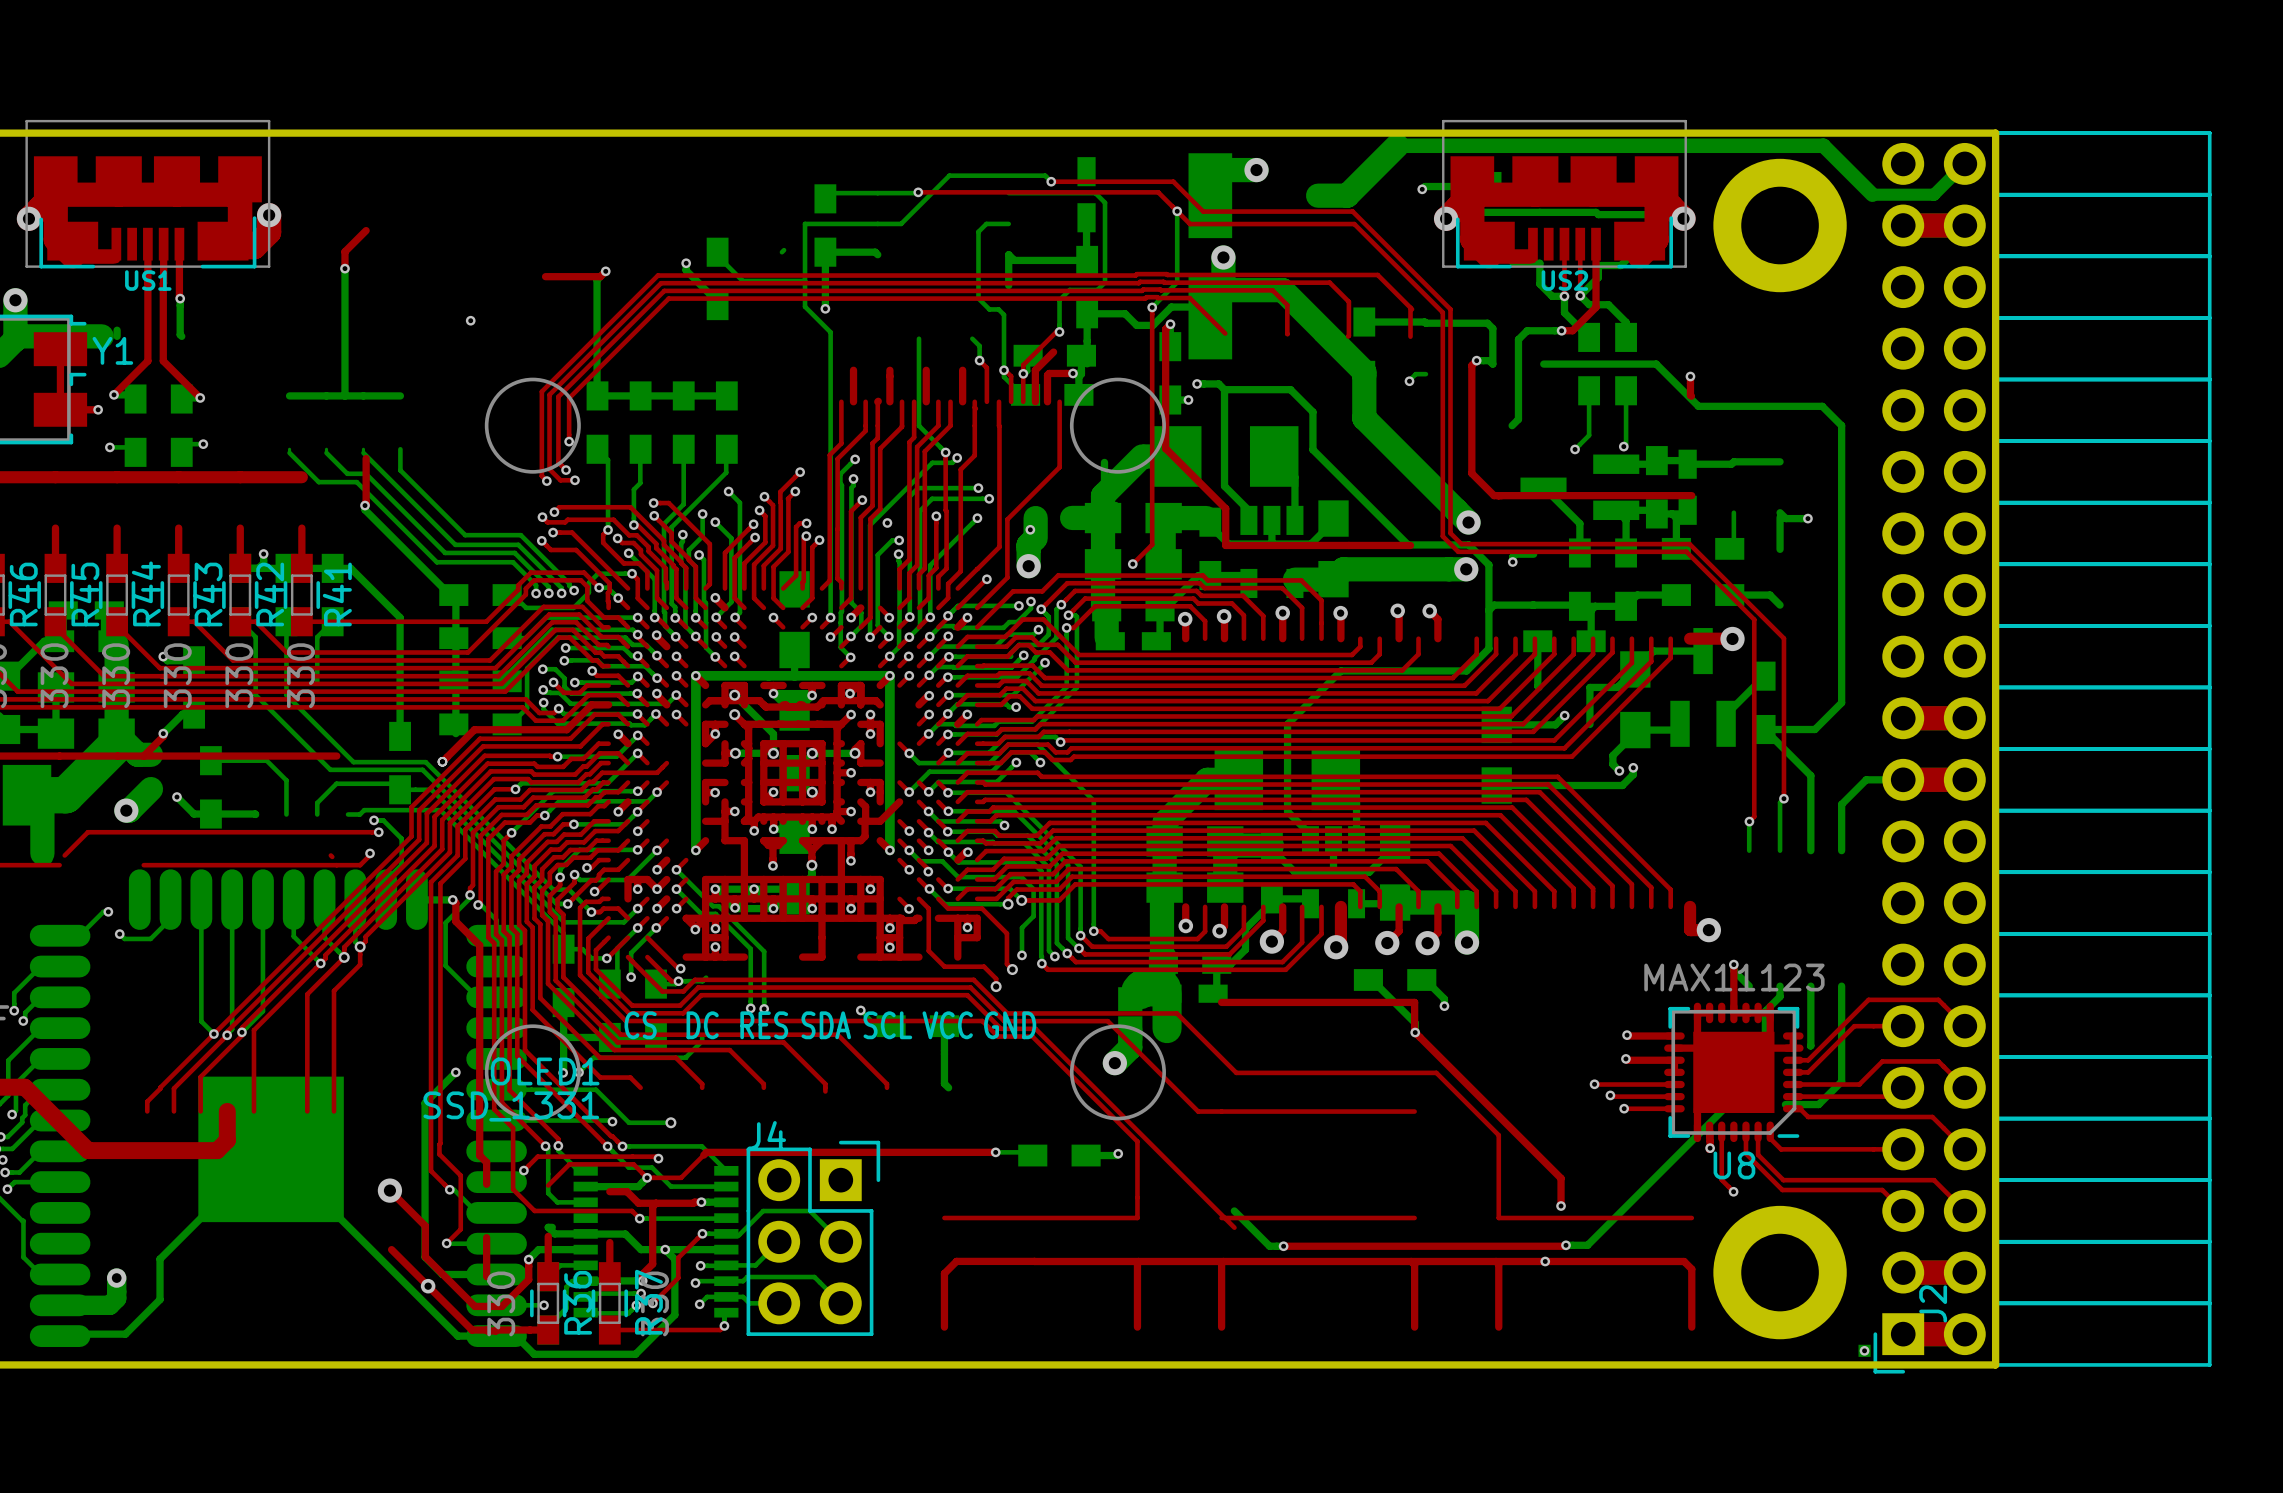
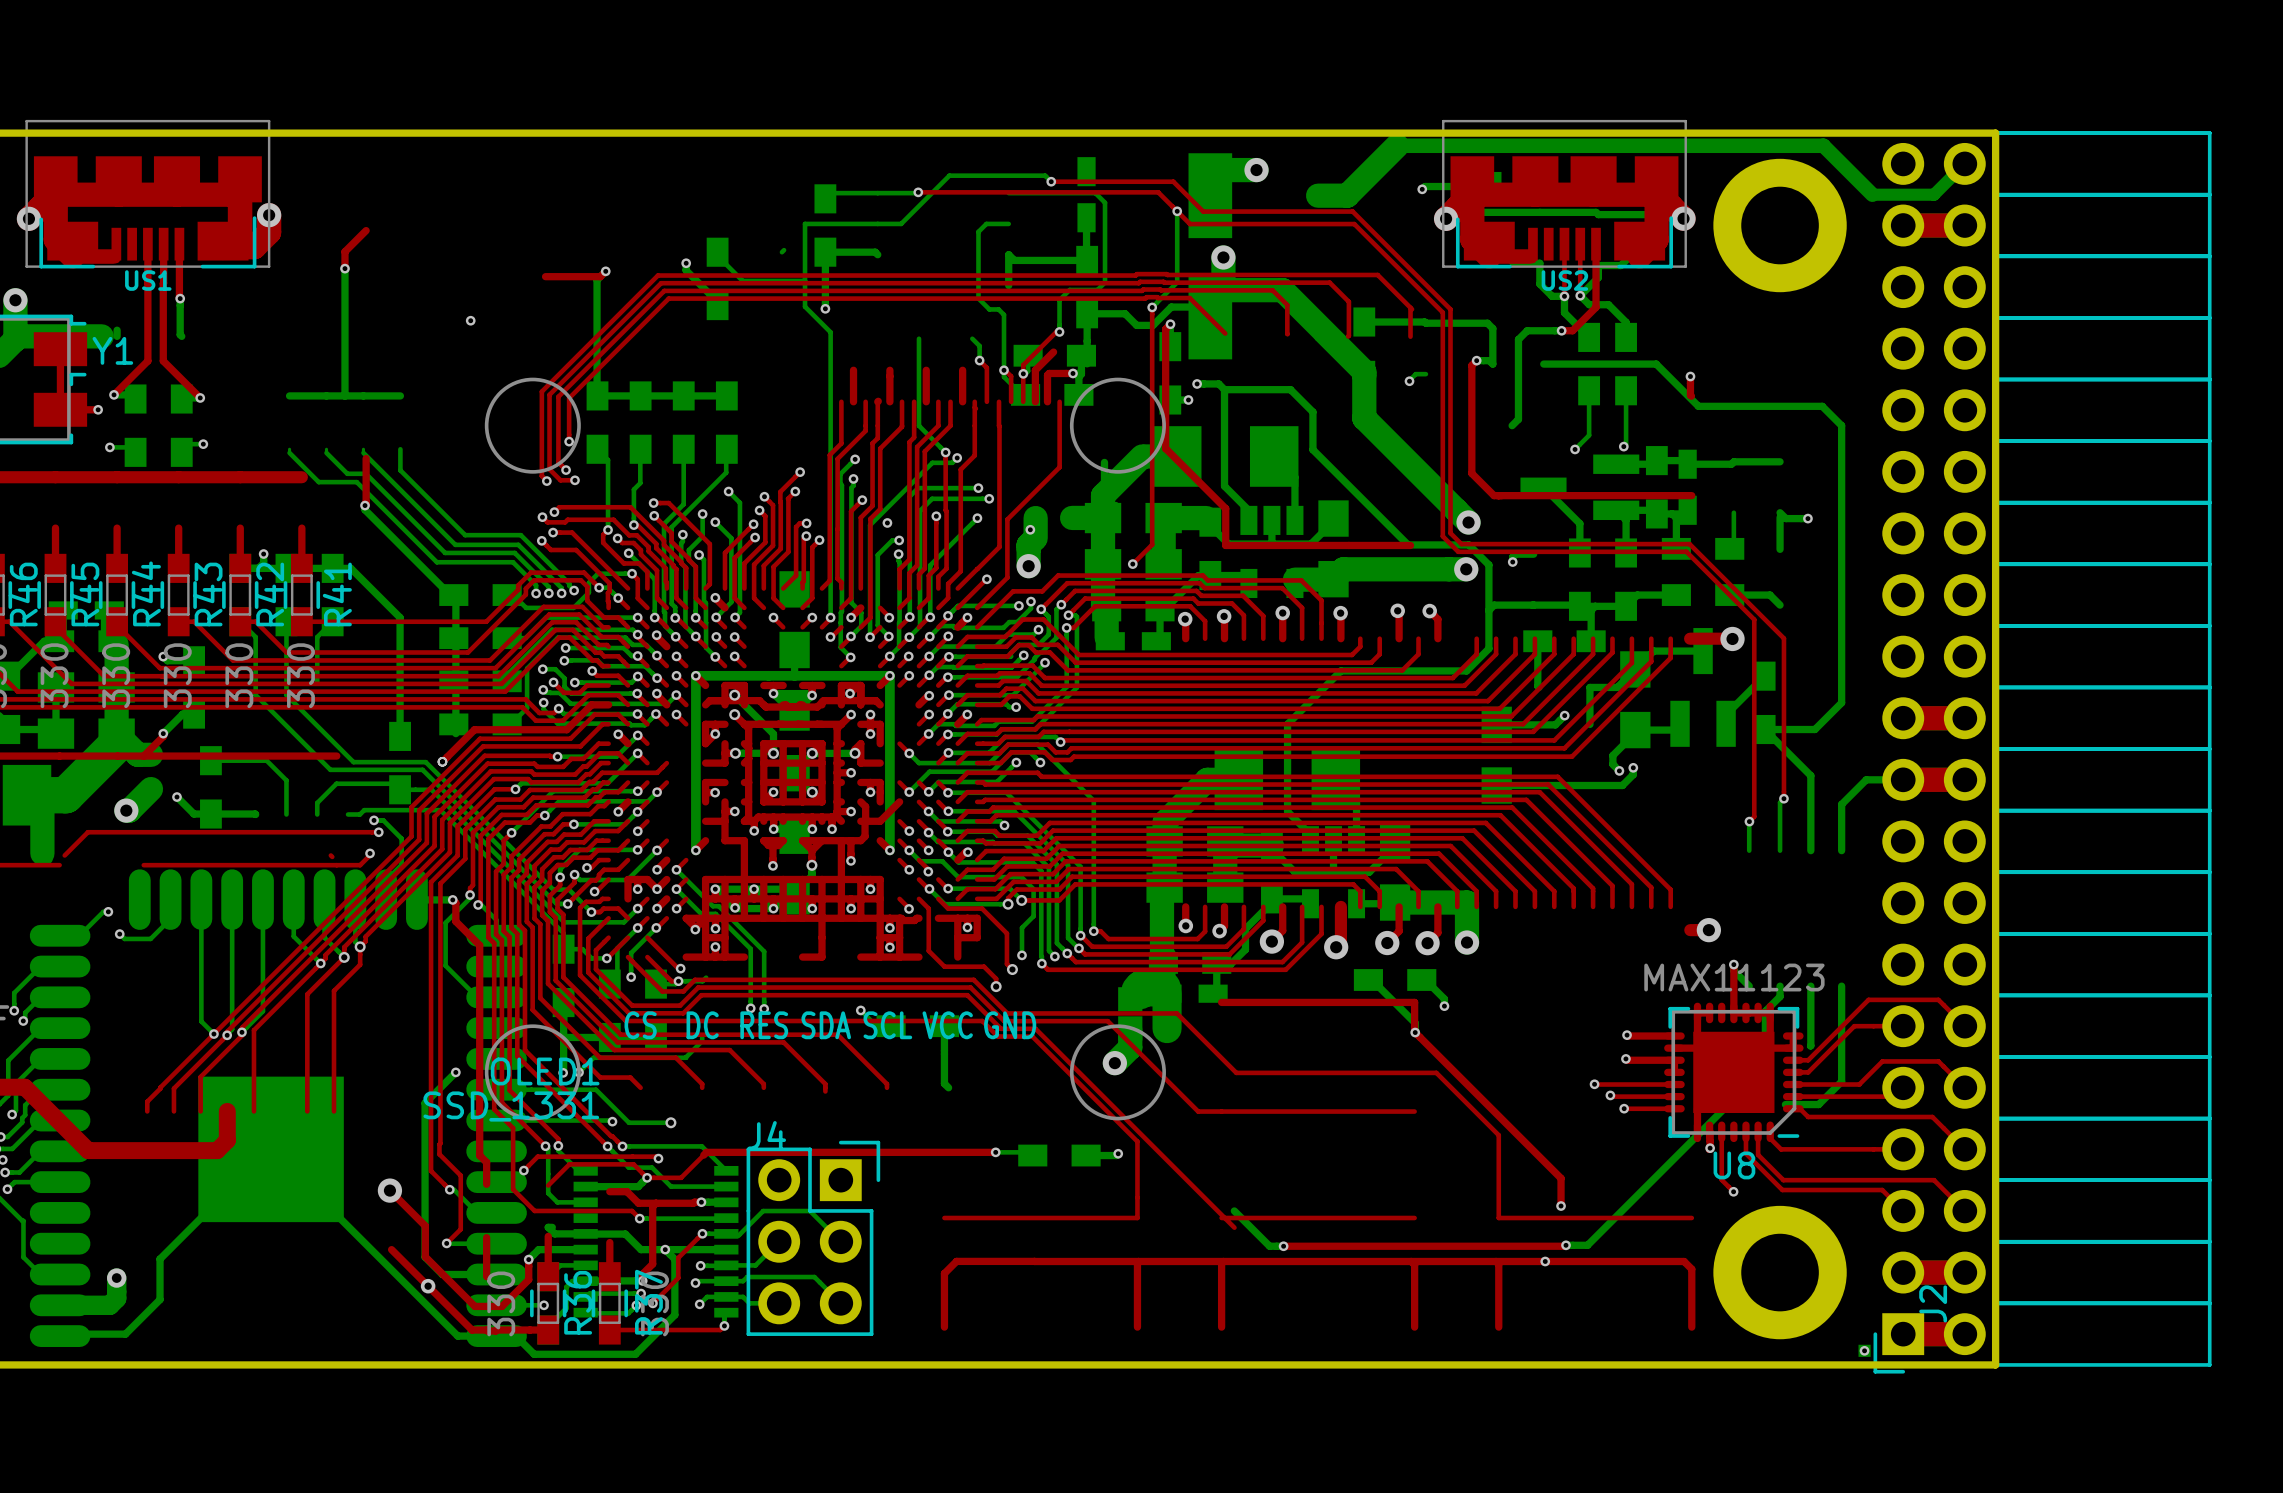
top track: (1690, 906) (1690, 929) -> none

